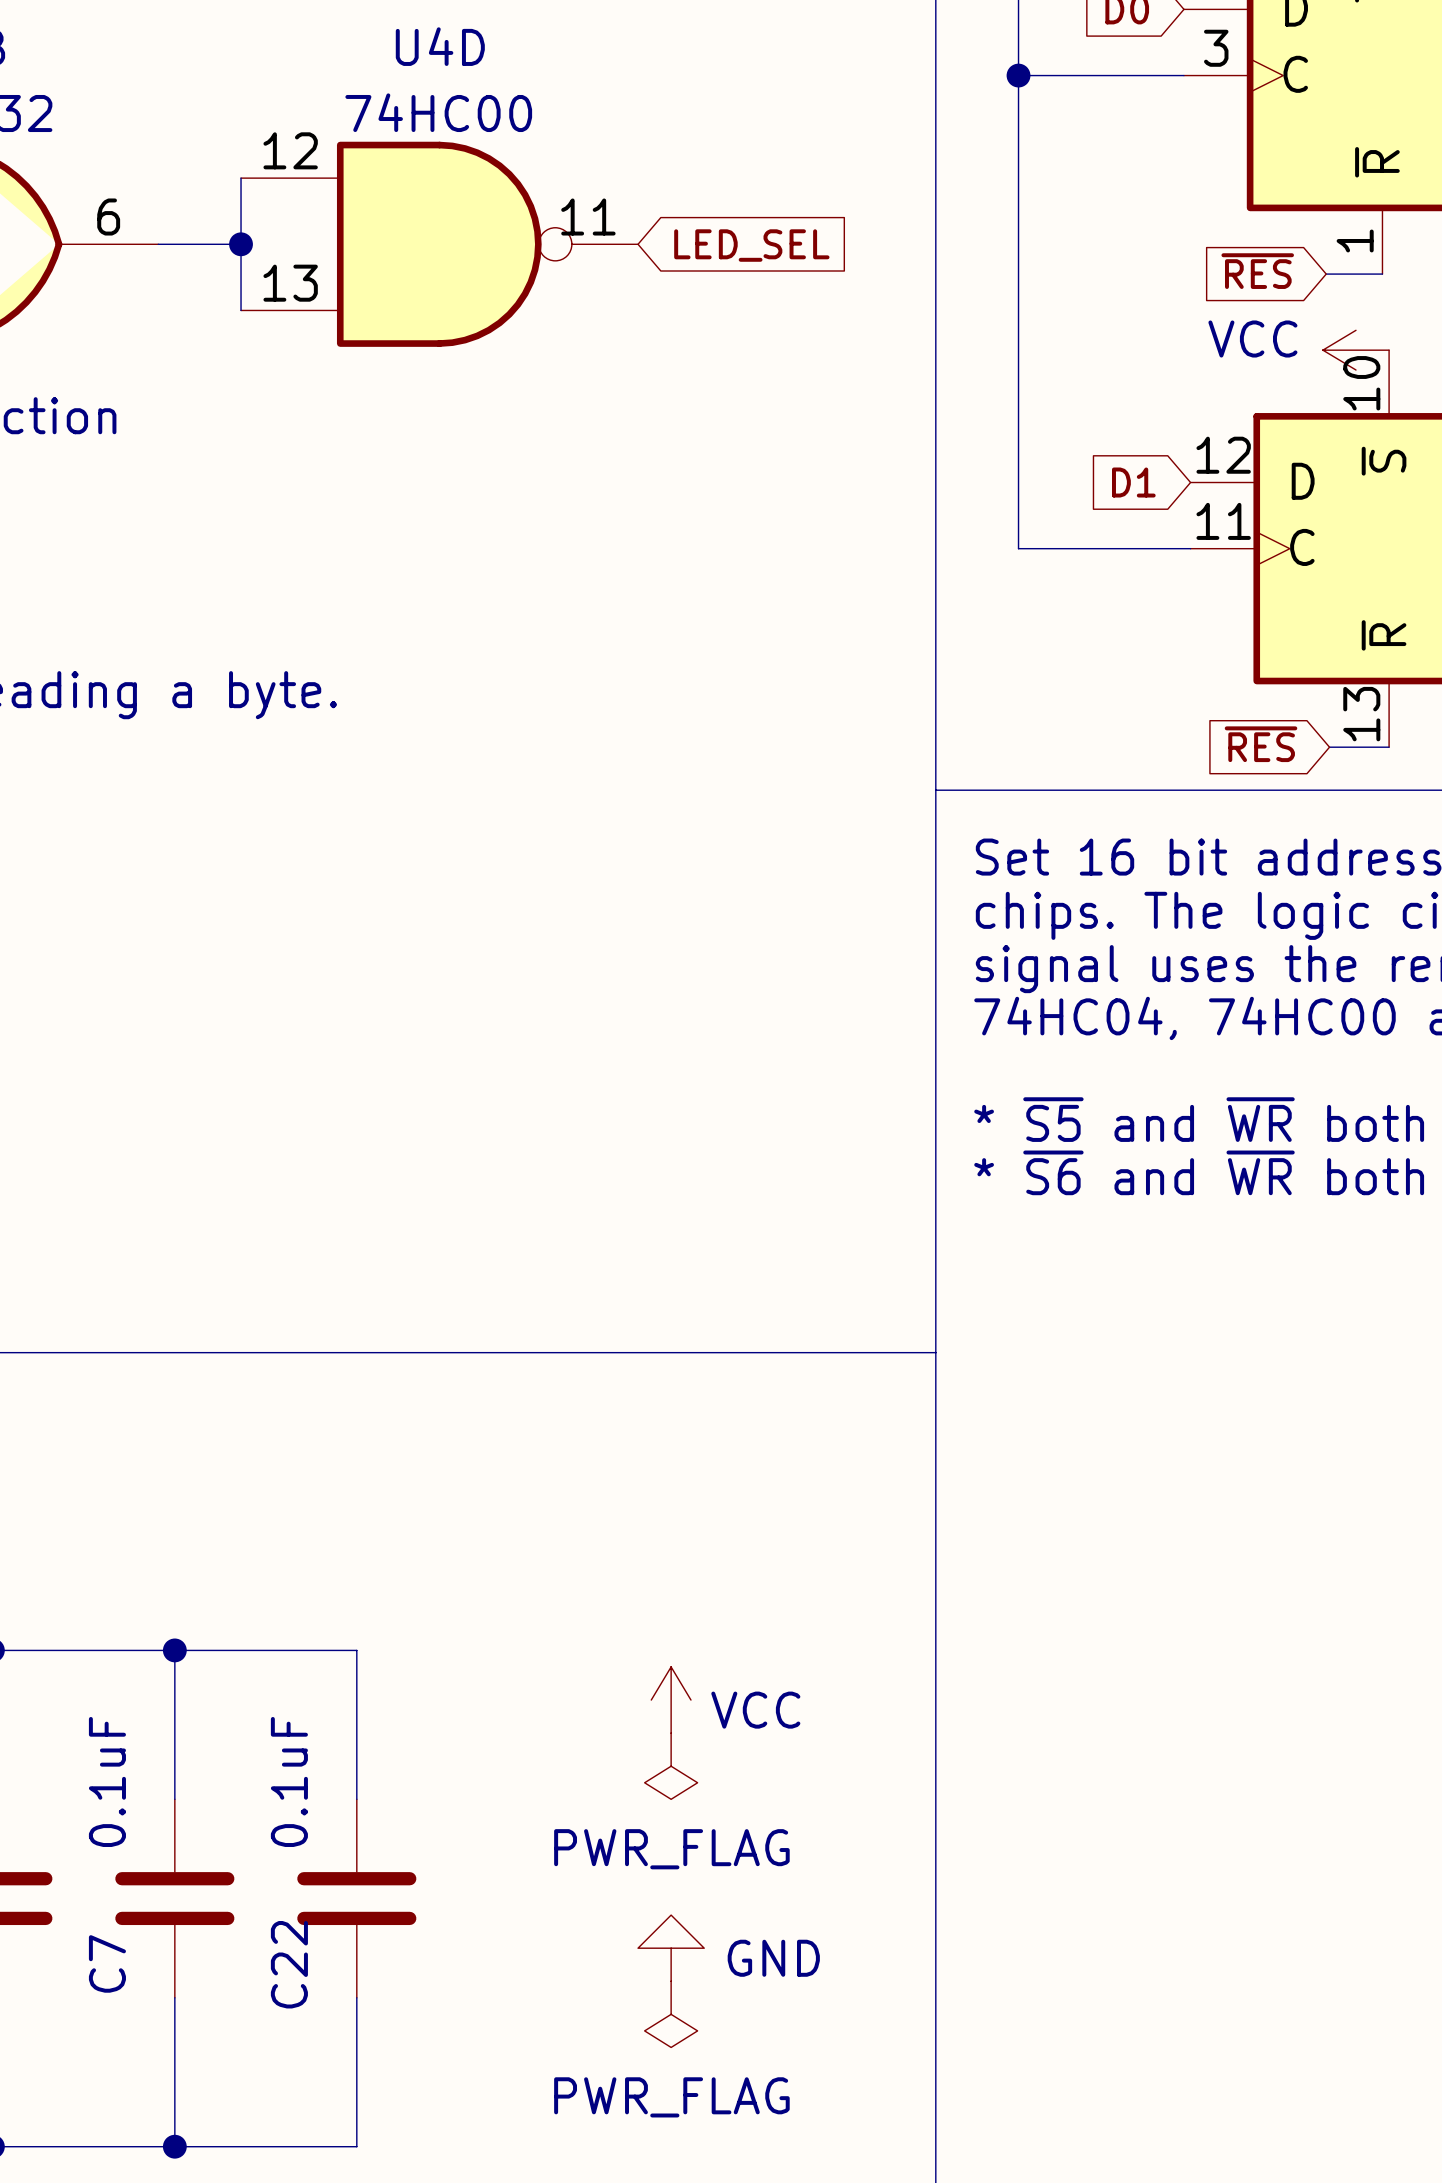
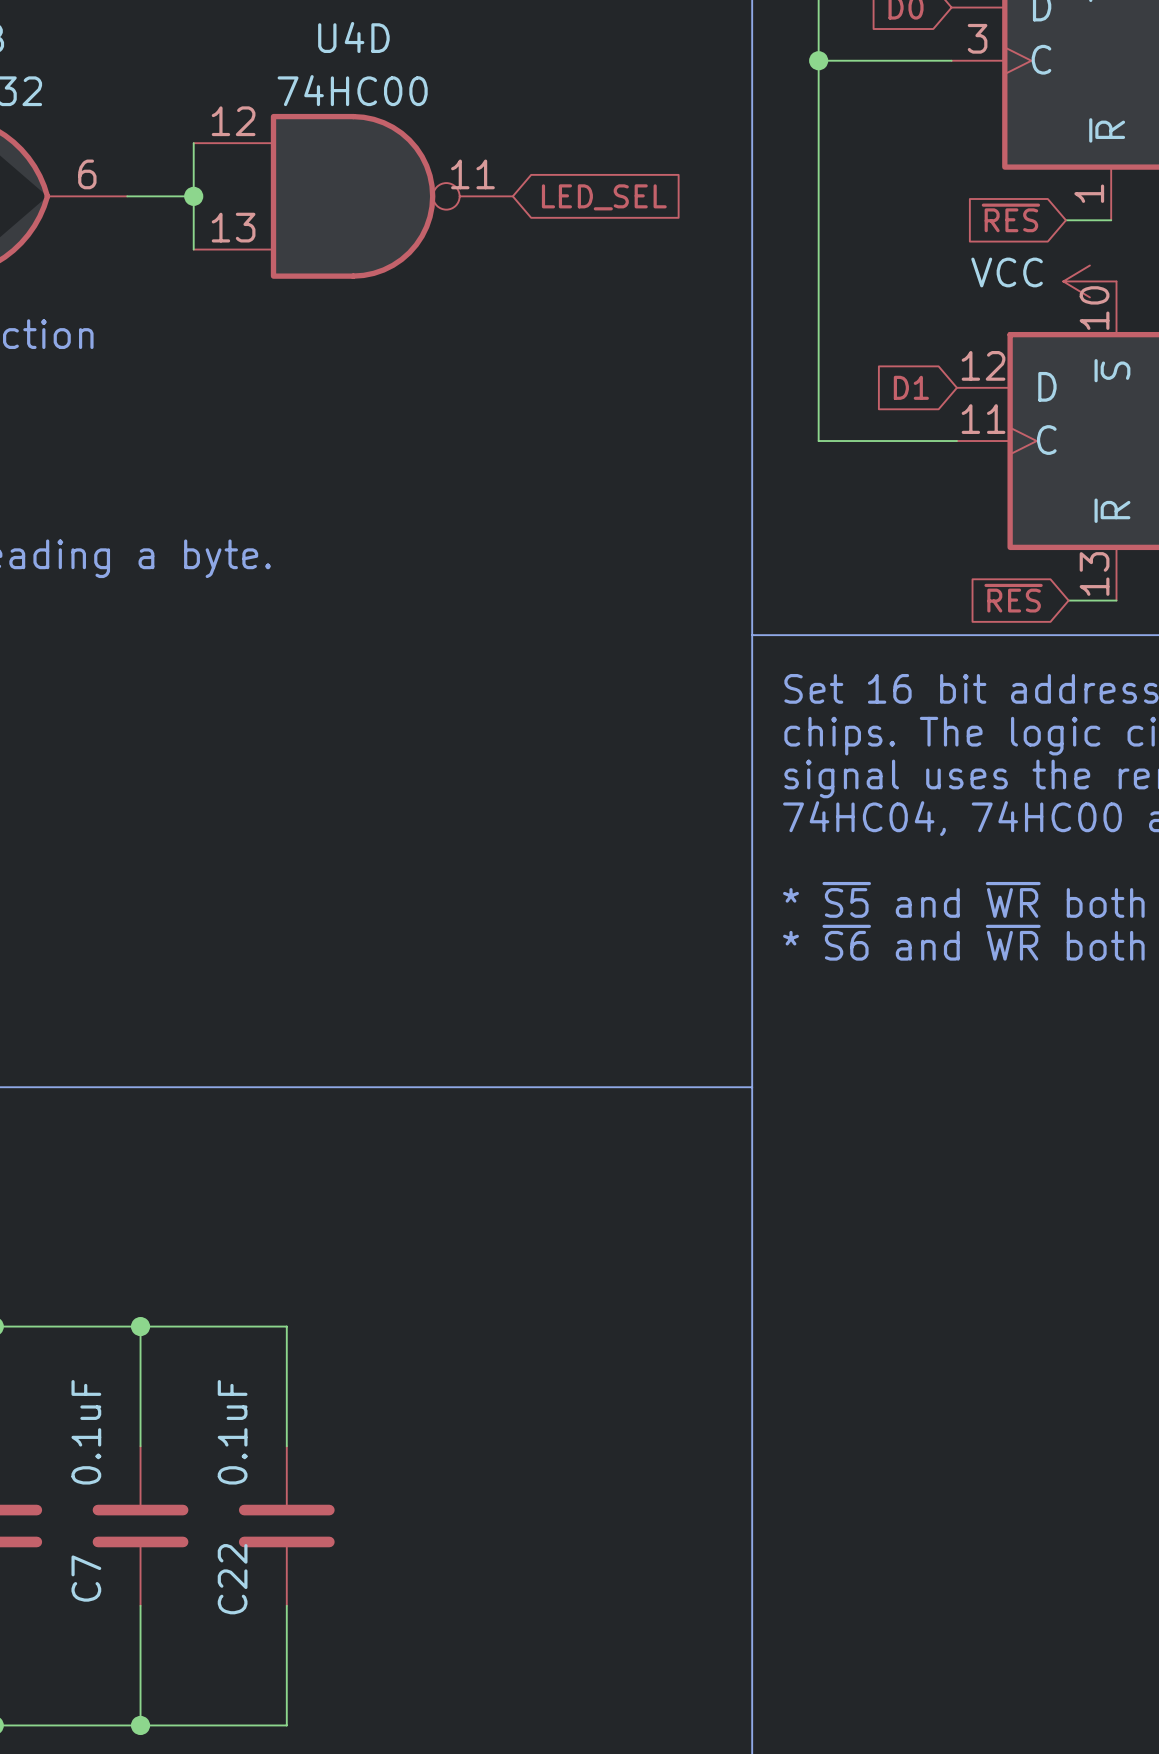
power symbol: VCC (671, 1700) -> none
power symbol: PWR_FLAG (671, 1766) -> none
power symbol: GND (671, 1948) -> none
power symbol: PWR_FLAG (671, 2014) -> none

